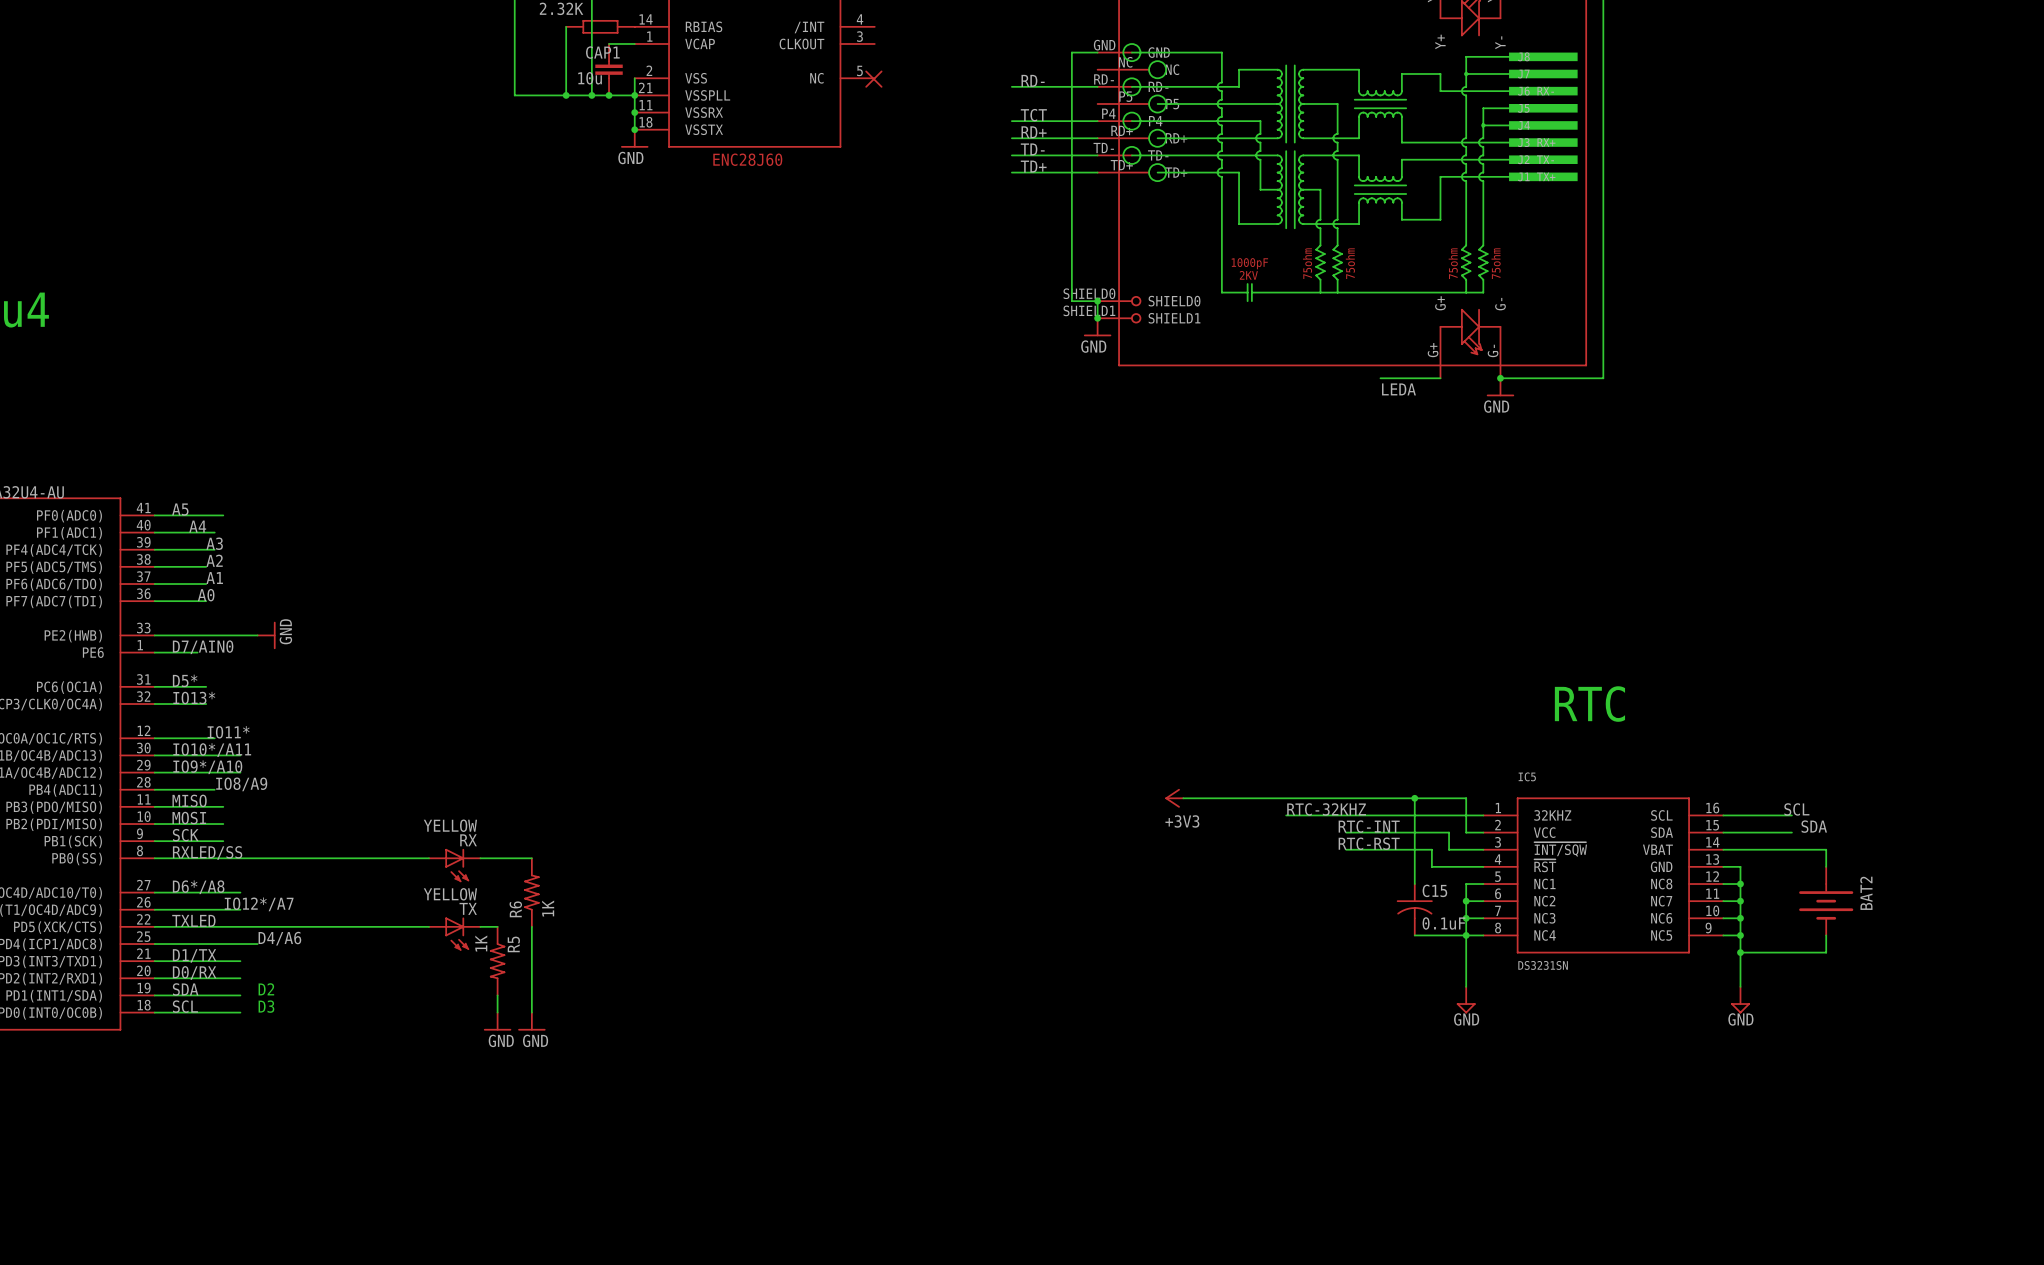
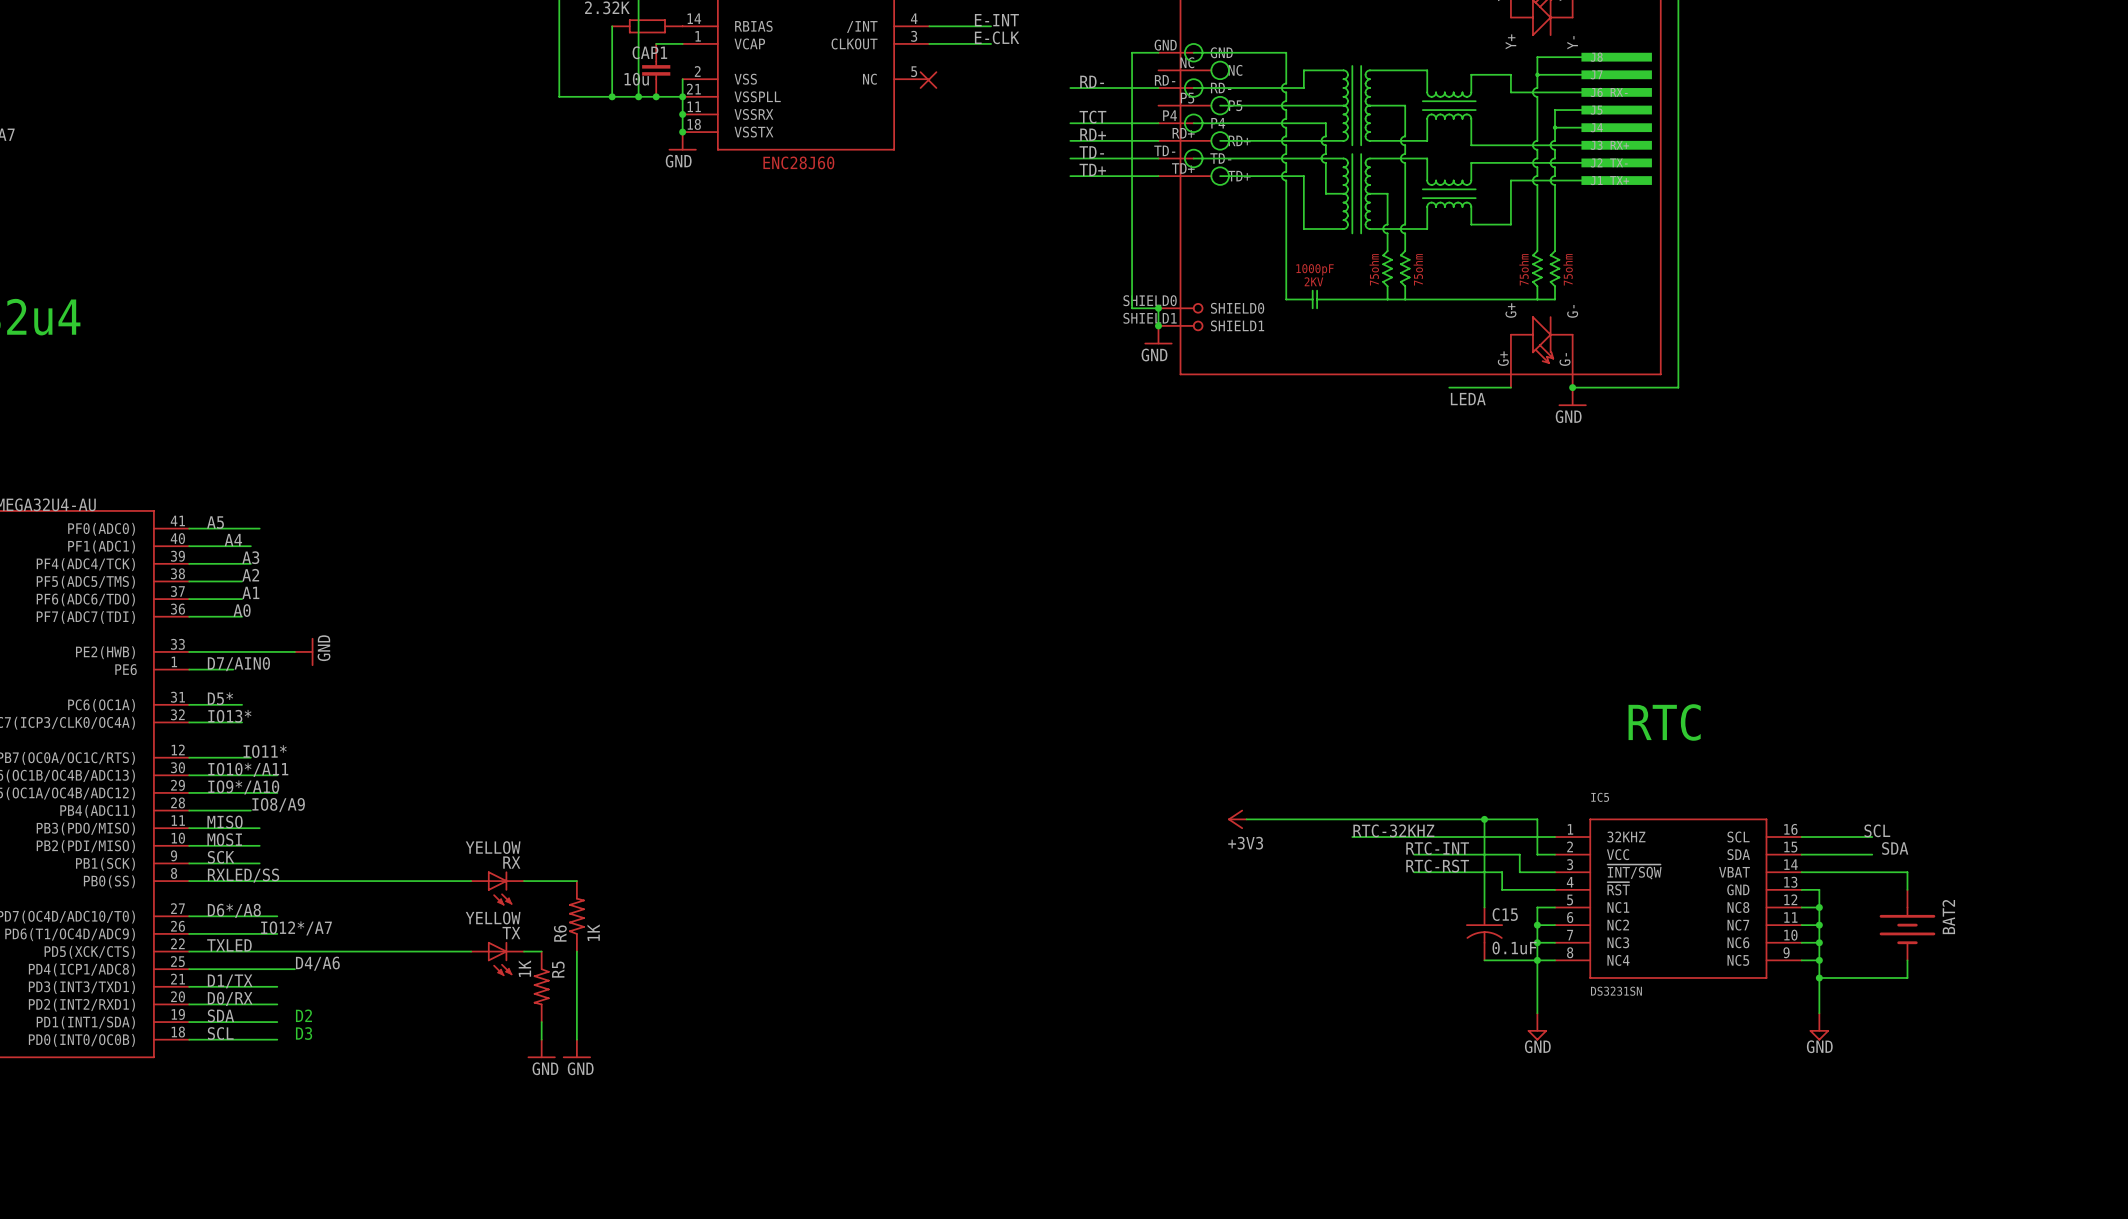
label: none -> E-INT (996, 20)
wire: none -> (929, 26) (991, 26)
label: none -> E-CLK (997, 37)
wire: none -> (929, 43) (991, 43)

